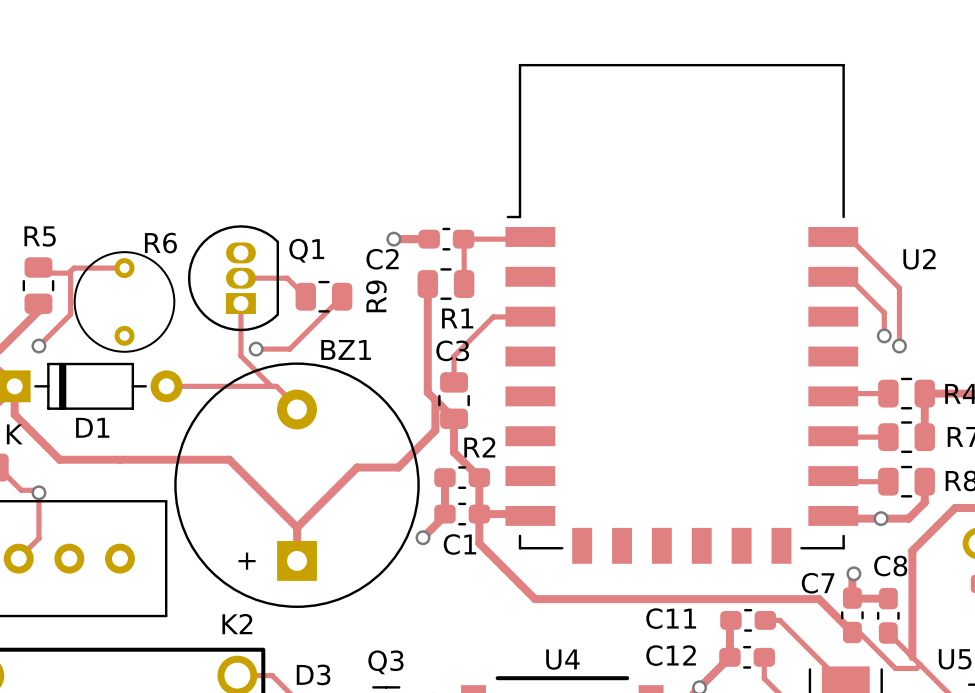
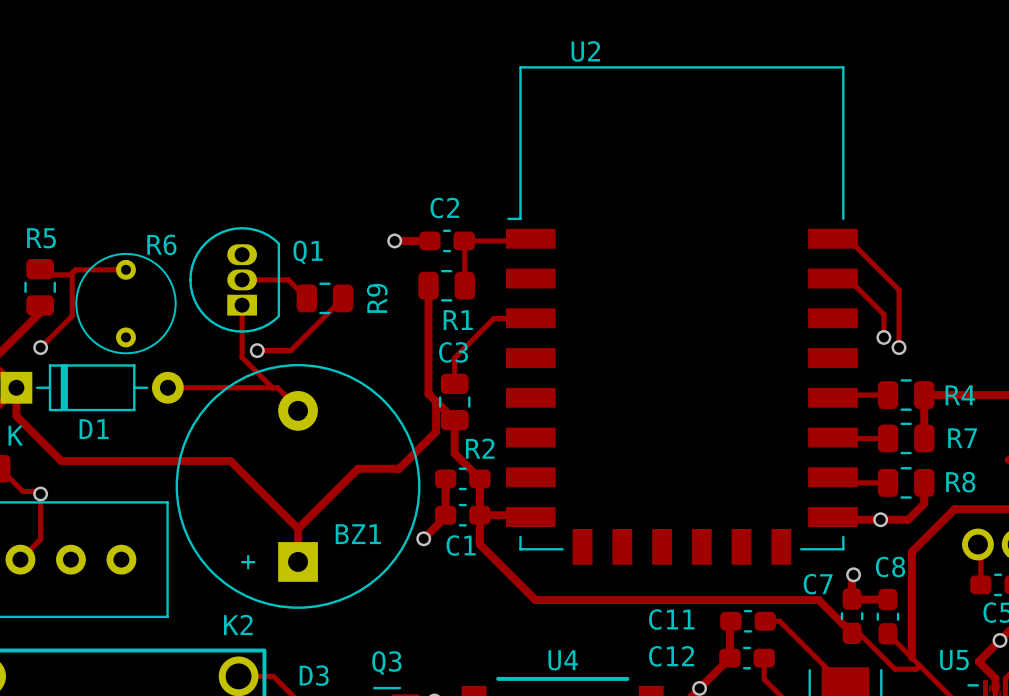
C2 name position: C2 (382, 259) -> C2 (444, 207)
U2 name position: U2 (919, 259) -> U2 (585, 51)
BZ1 name position: BZ1 (346, 349) -> BZ1 (358, 534)

